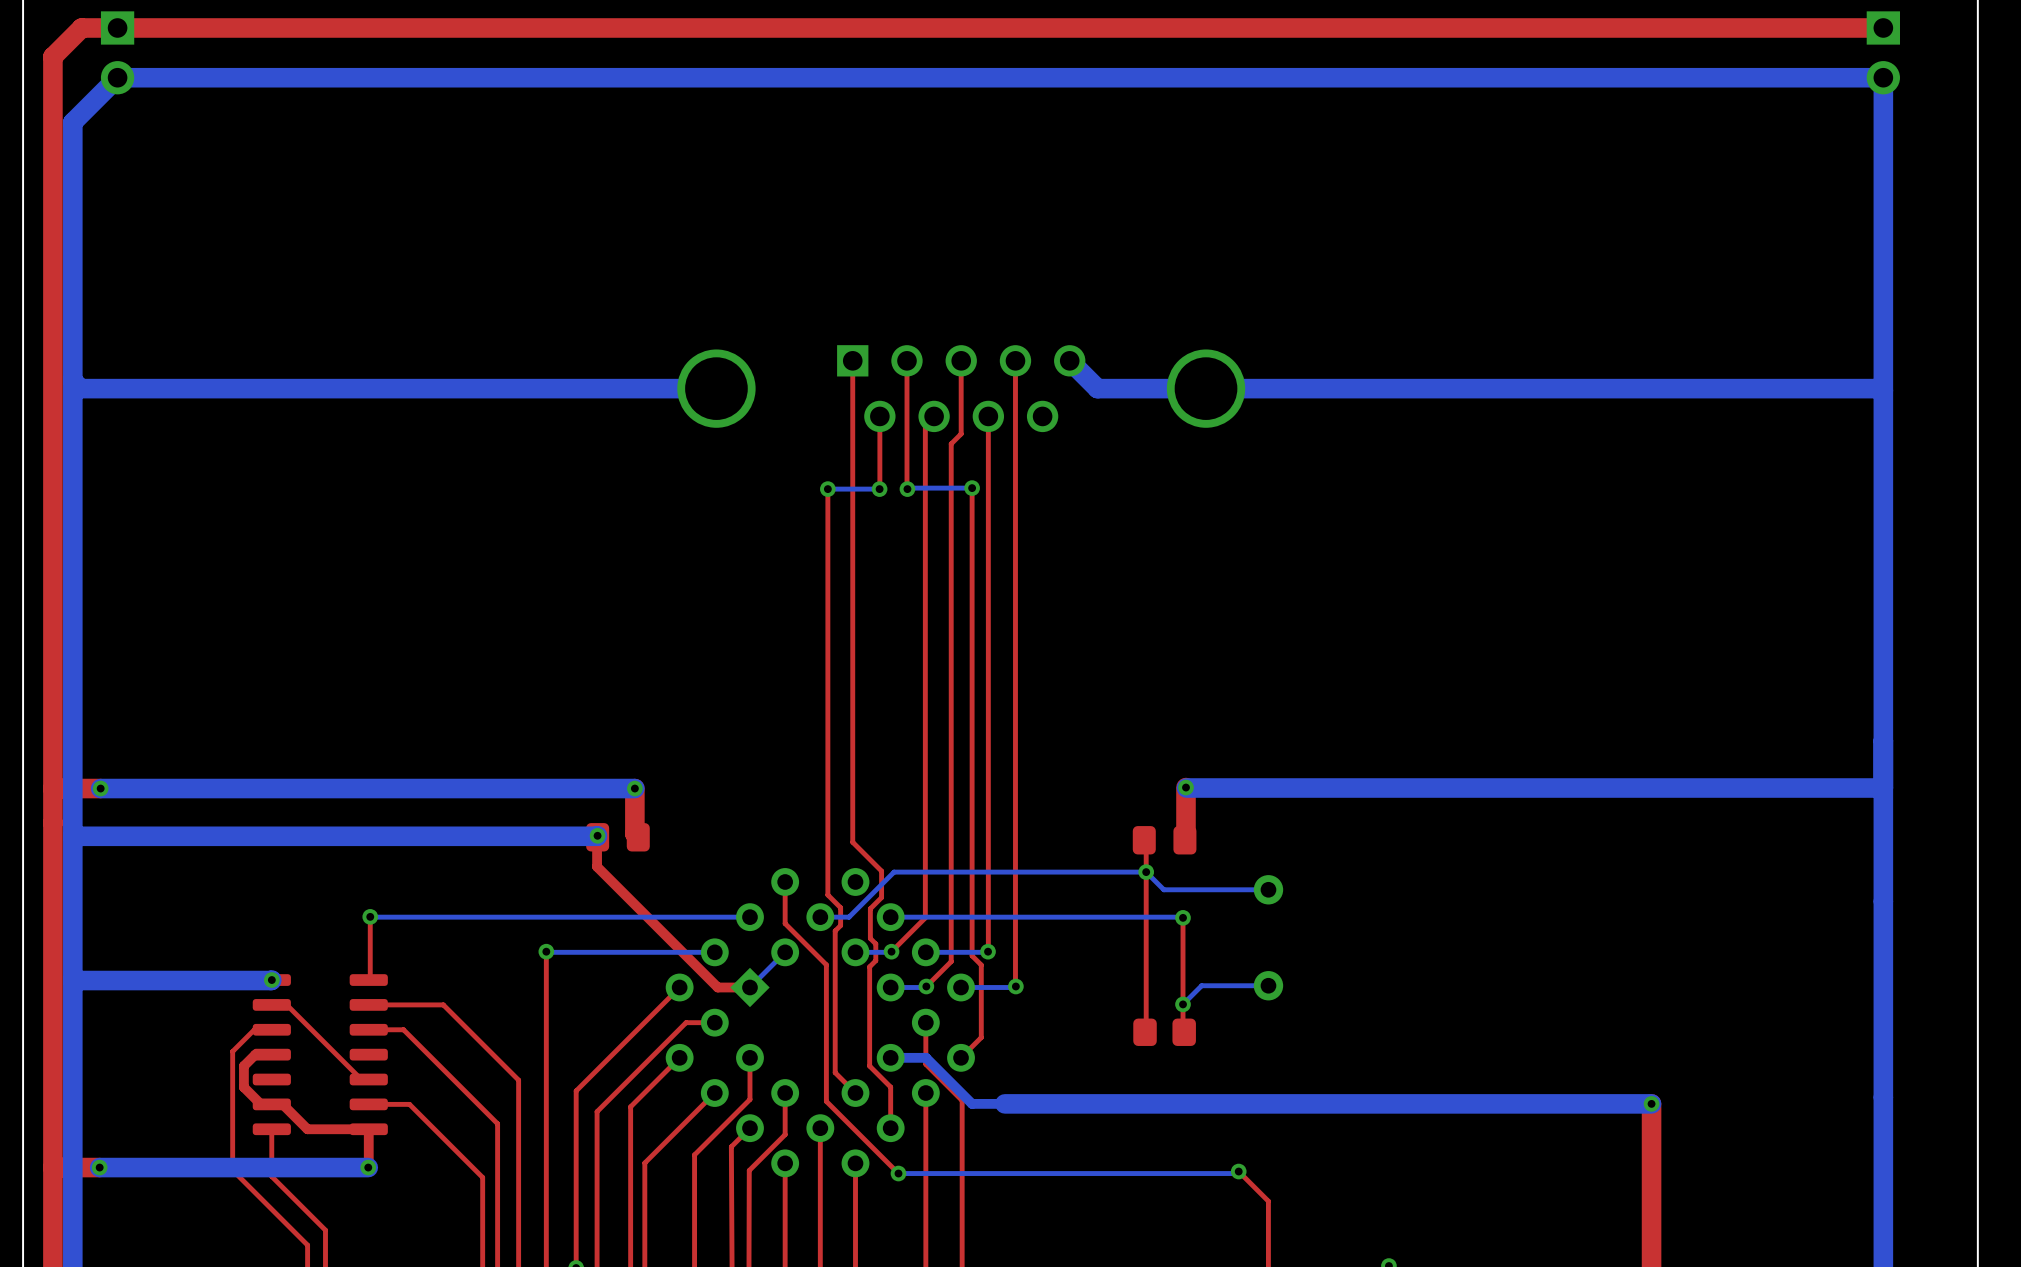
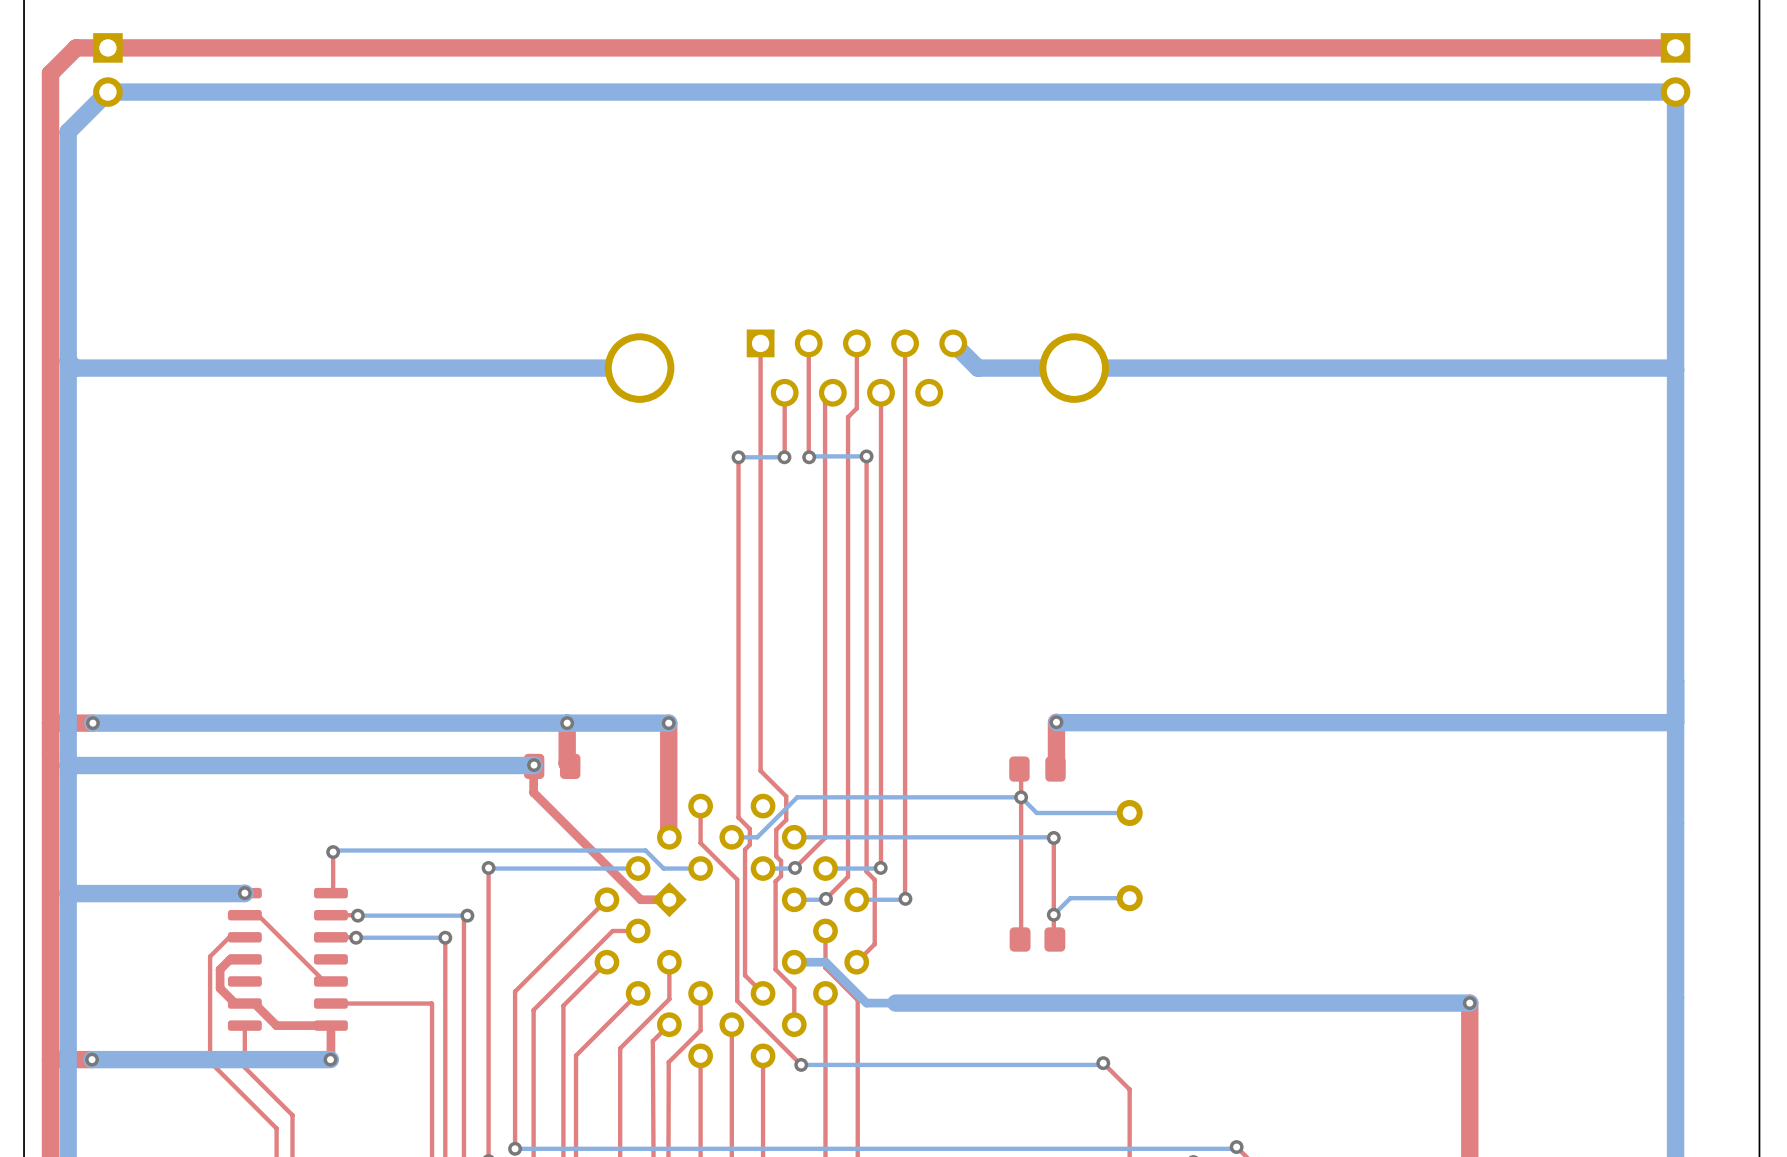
top track: none -> (668, 723) (669, 837)
bottom track: none -> (668, 723) (567, 723)
via: none -> (668, 723)
top track: (370, 916) (370, 978) -> (333, 852) (332, 891)
bottom track: (370, 916) (749, 917) -> none
via position: (370, 916) -> (333, 852)
bottom track: (785, 952) (749, 987) -> (700, 868) (663, 868) (645, 850) (334, 850) (333, 852)
top track: (398, 1004) (443, 1004) (518, 1080) -> (467, 915) (463, 919) (463, 982)
via: none -> (357, 915)
bottom track: none -> (467, 915) (357, 915)
via: none -> (467, 915)
top track: (396, 1029) (403, 1029) (497, 1123) -> (445, 937) (445, 1020)
via: none -> (356, 937)
bottom track: none -> (445, 937) (356, 937)
via: none -> (445, 937)
top track: (409, 1104) (482, 1177) -> (367, 1003) (431, 1003) (432, 1068)

